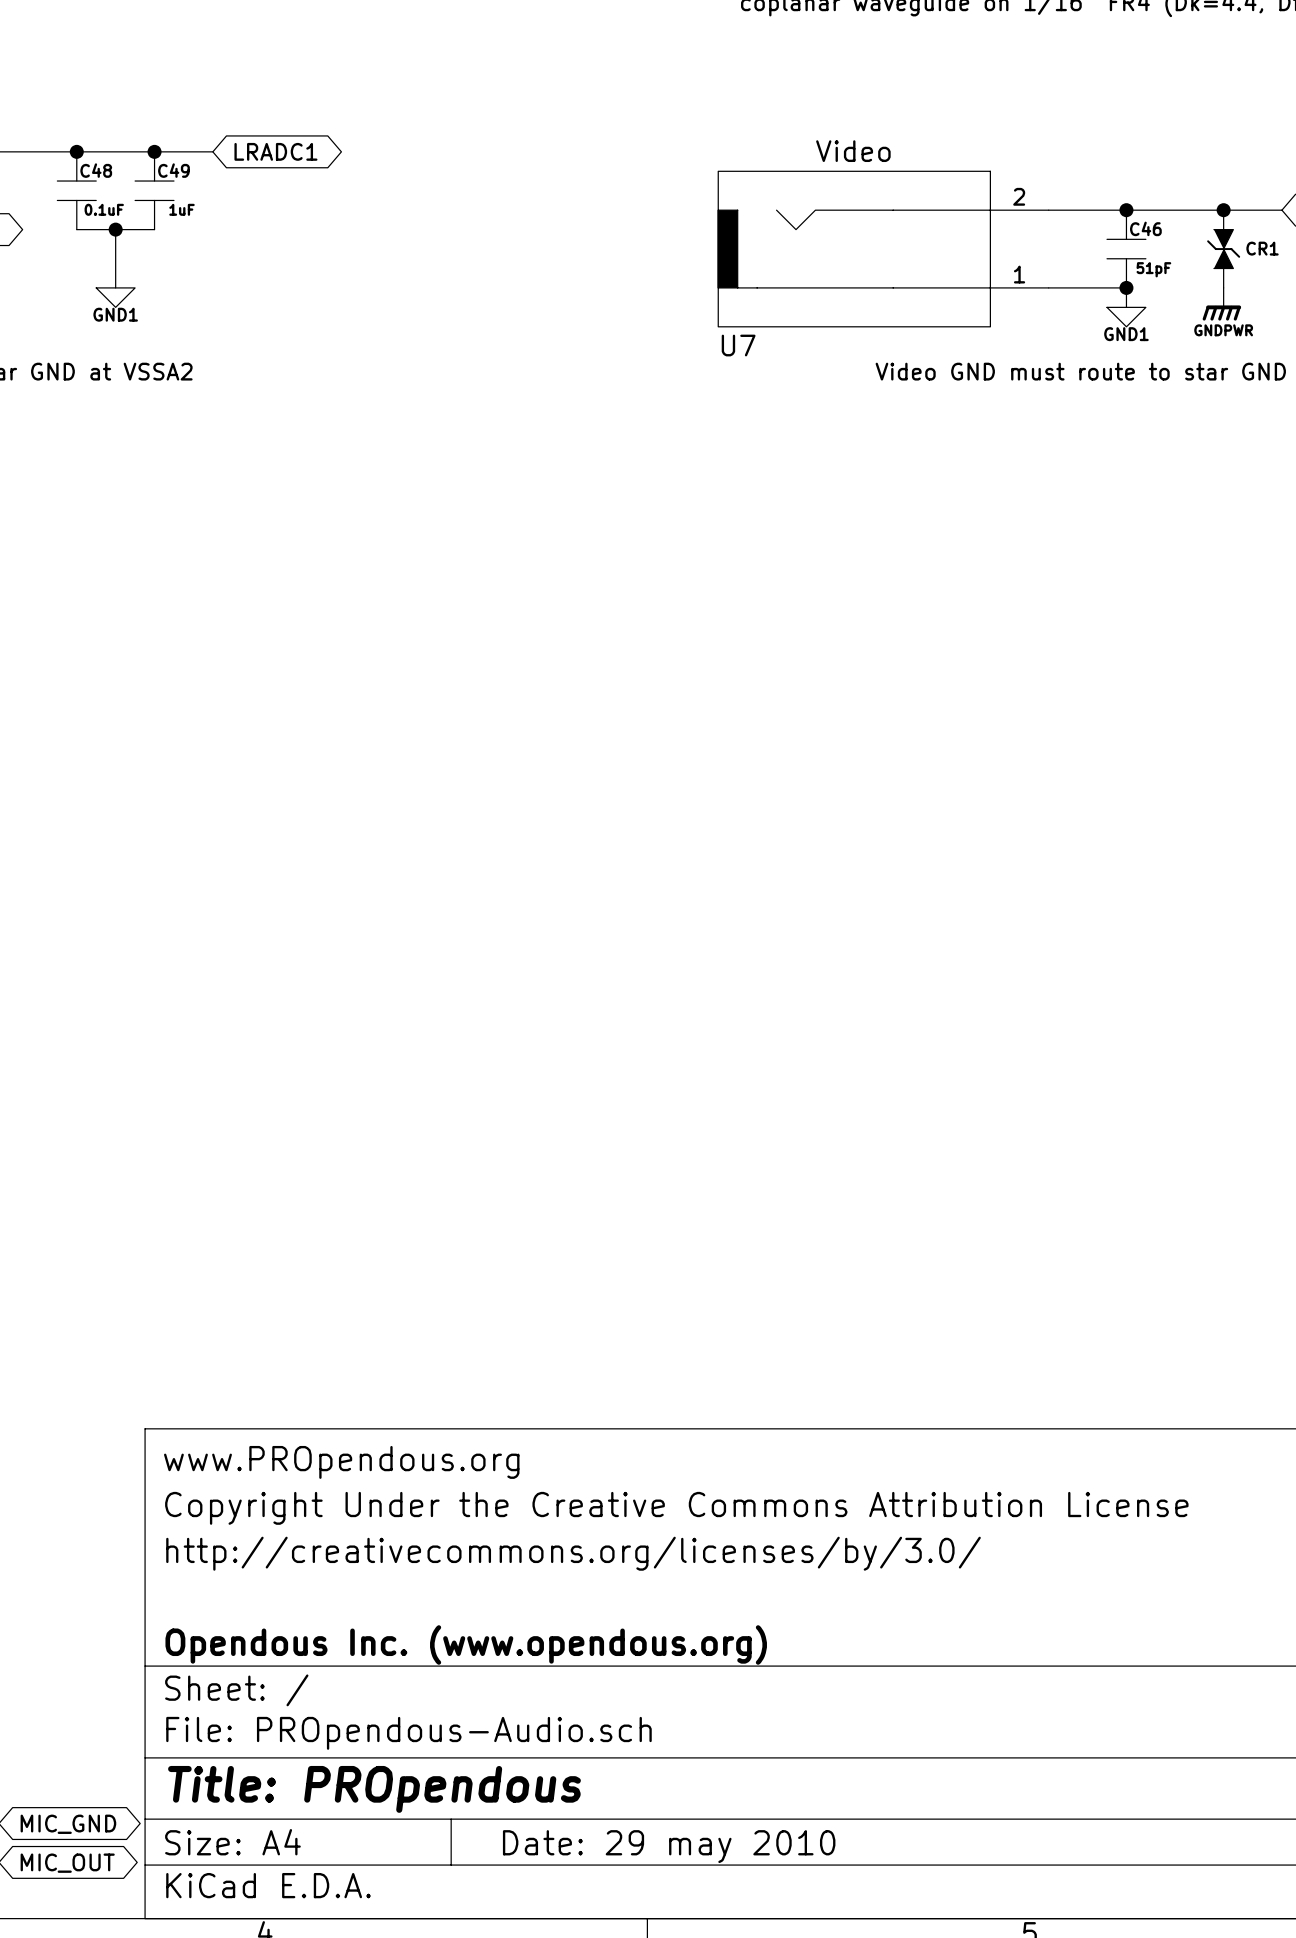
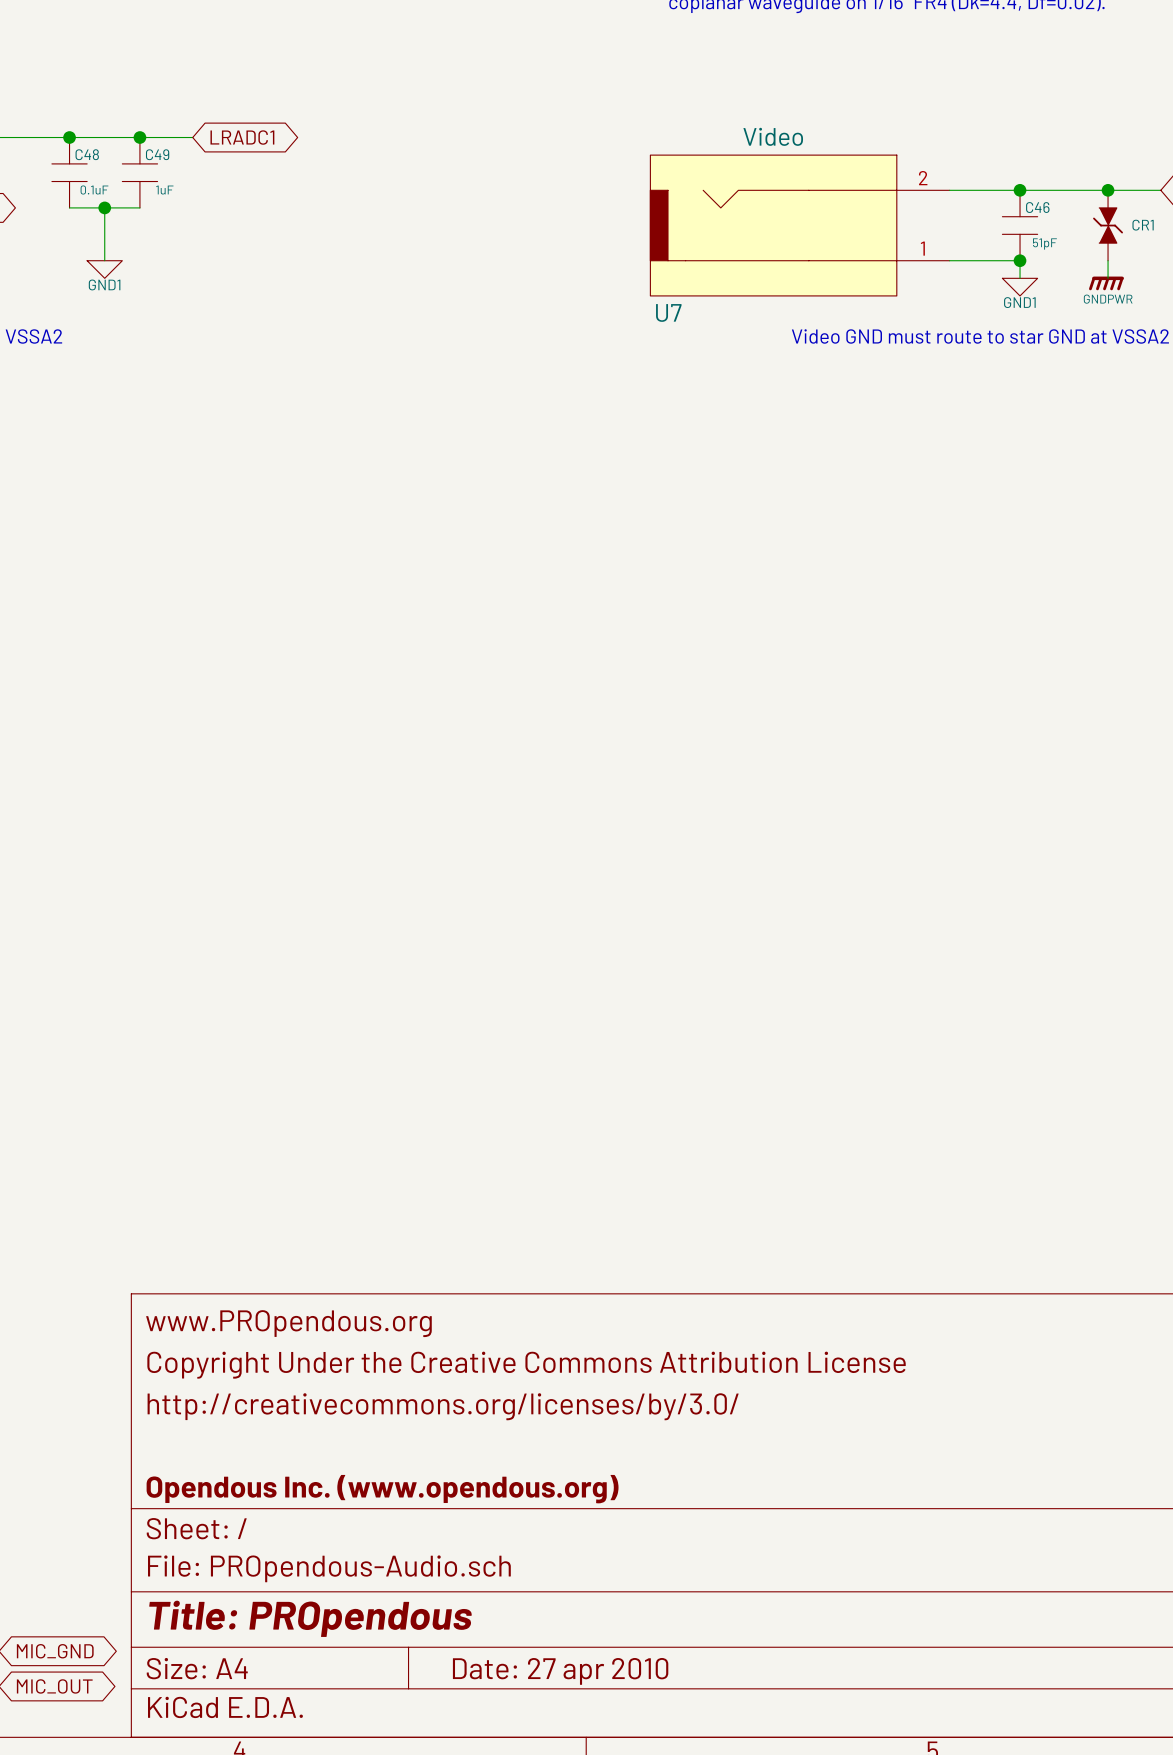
title block: Date: 29 may 2010 (669, 1846) -> Date: 27 apr 2010 (560, 1671)

